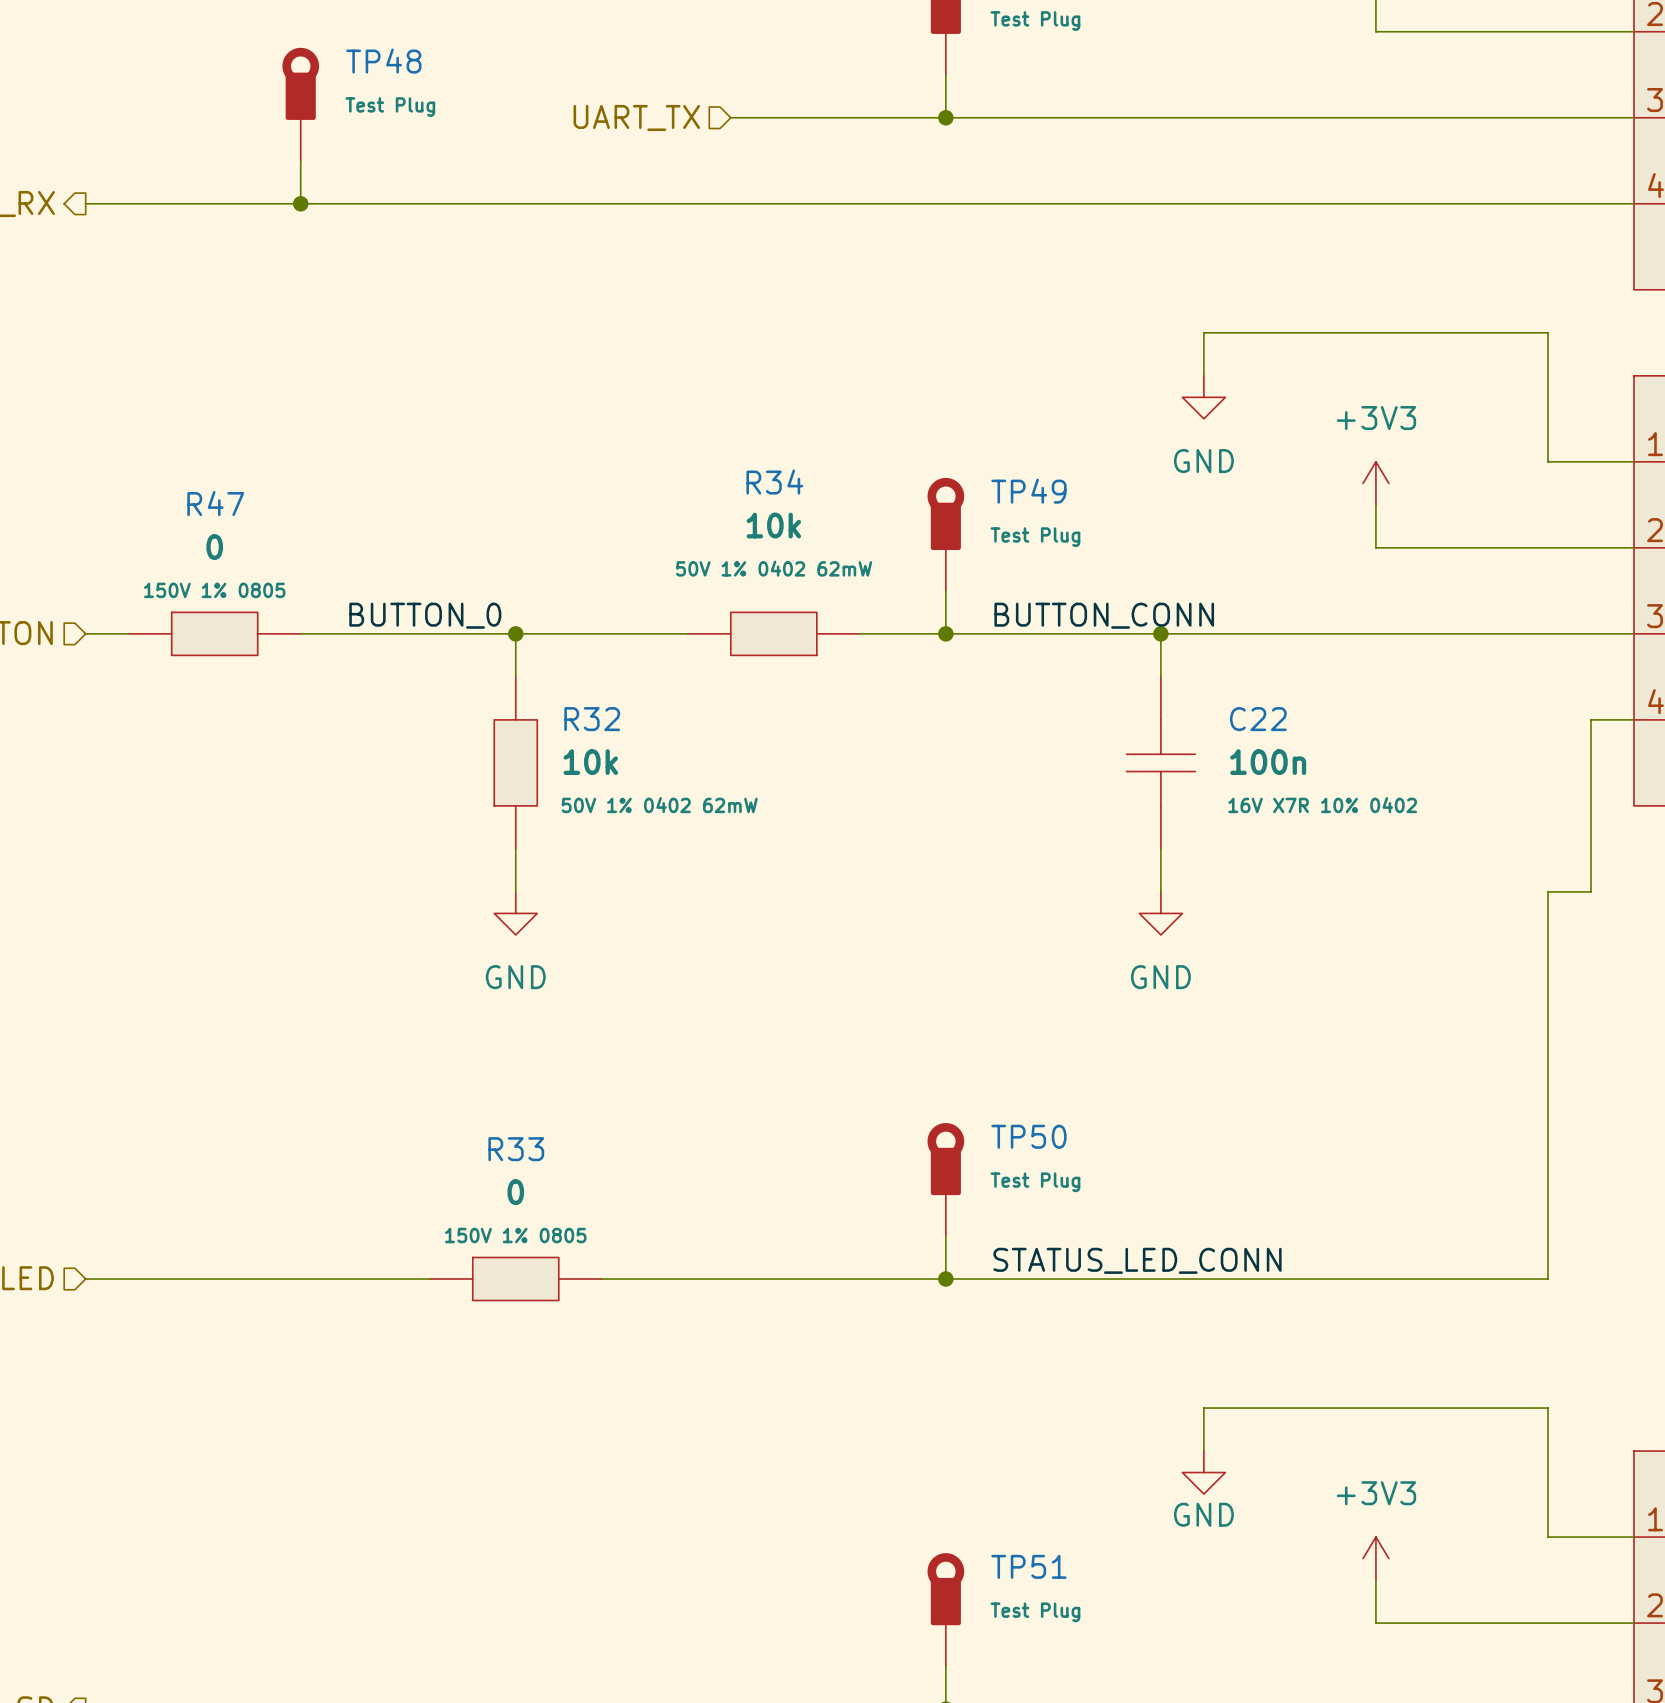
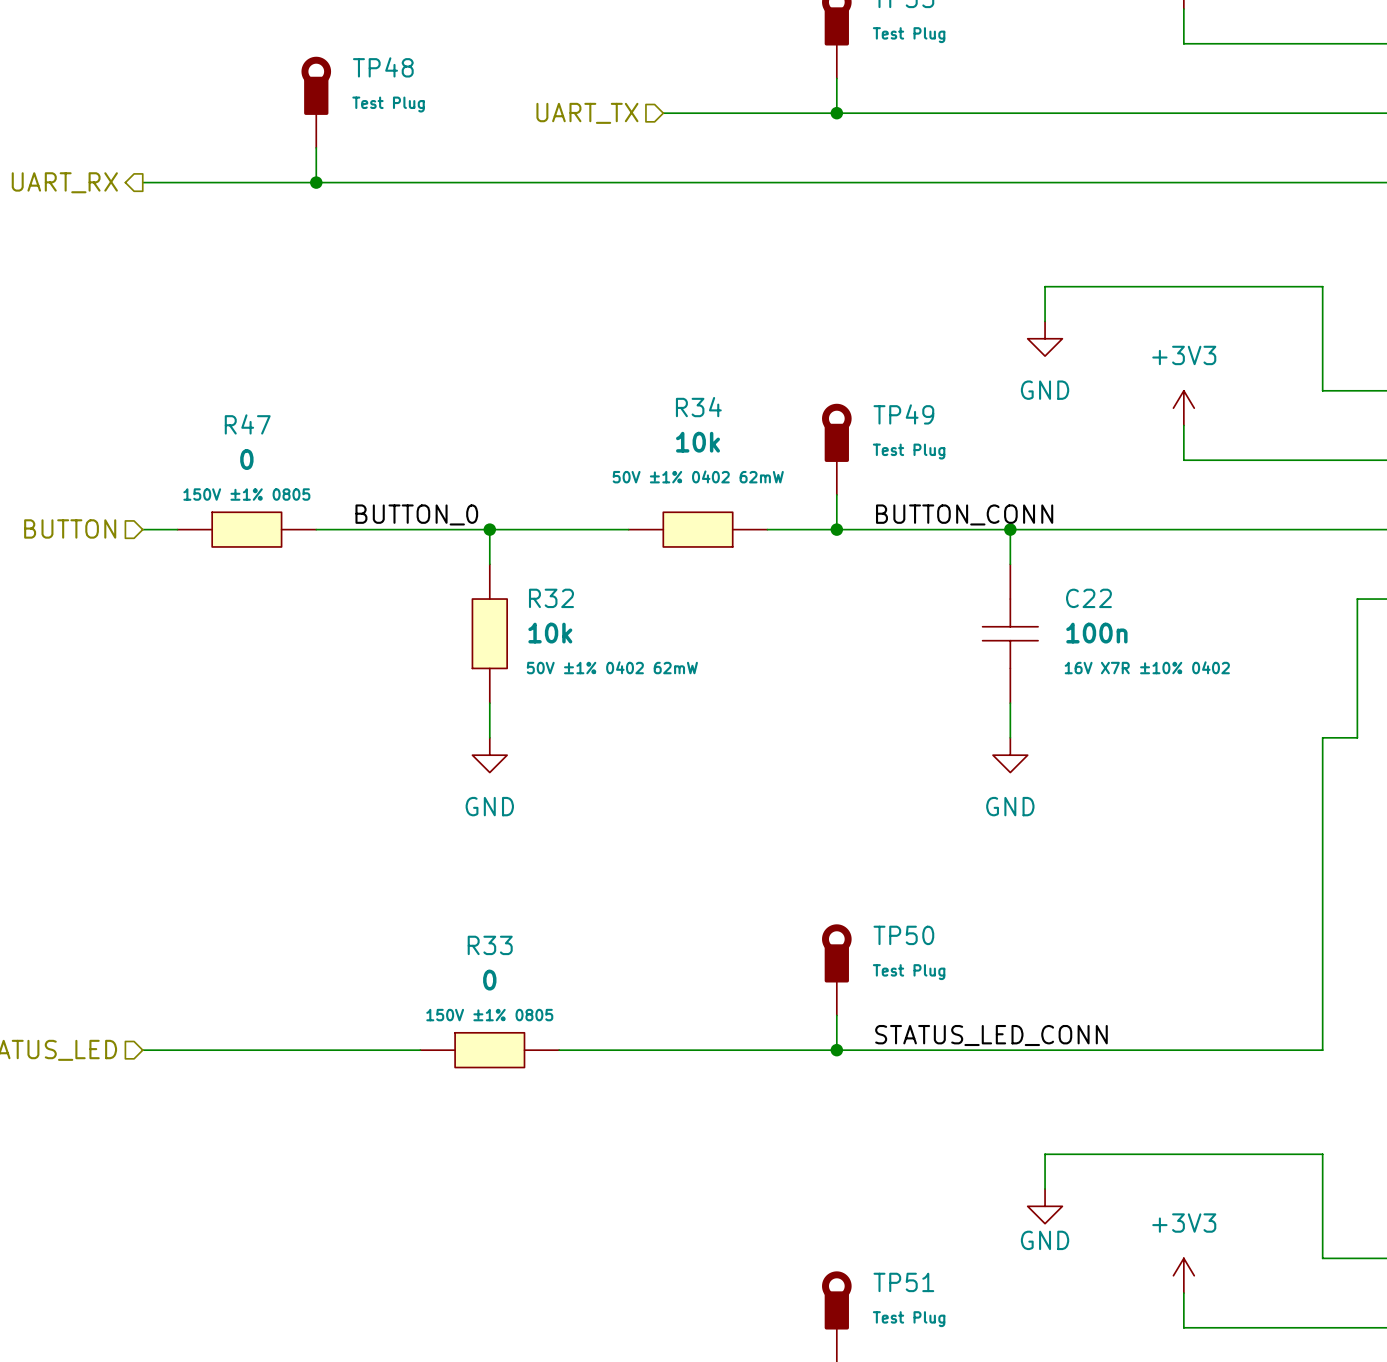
R34 text: 50V 1% 0402 62mW (774, 568) -> 50V ±1% 0402 62mW (698, 476)
R47 text: 150V 1% 0805 (214, 590) -> 150V ±1% 0805 (246, 494)
R32 text: 50V 1% 0402 62mW (659, 805) -> 50V ±1% 0402 62mW (612, 667)
C22 text: 16V X7R 10% 0402 (1322, 805) -> 16V X7R ±10% 0402 (1147, 667)
R33 text: 150V 1% 0805 (515, 1235) -> 150V ±1% 0805 (489, 1015)

